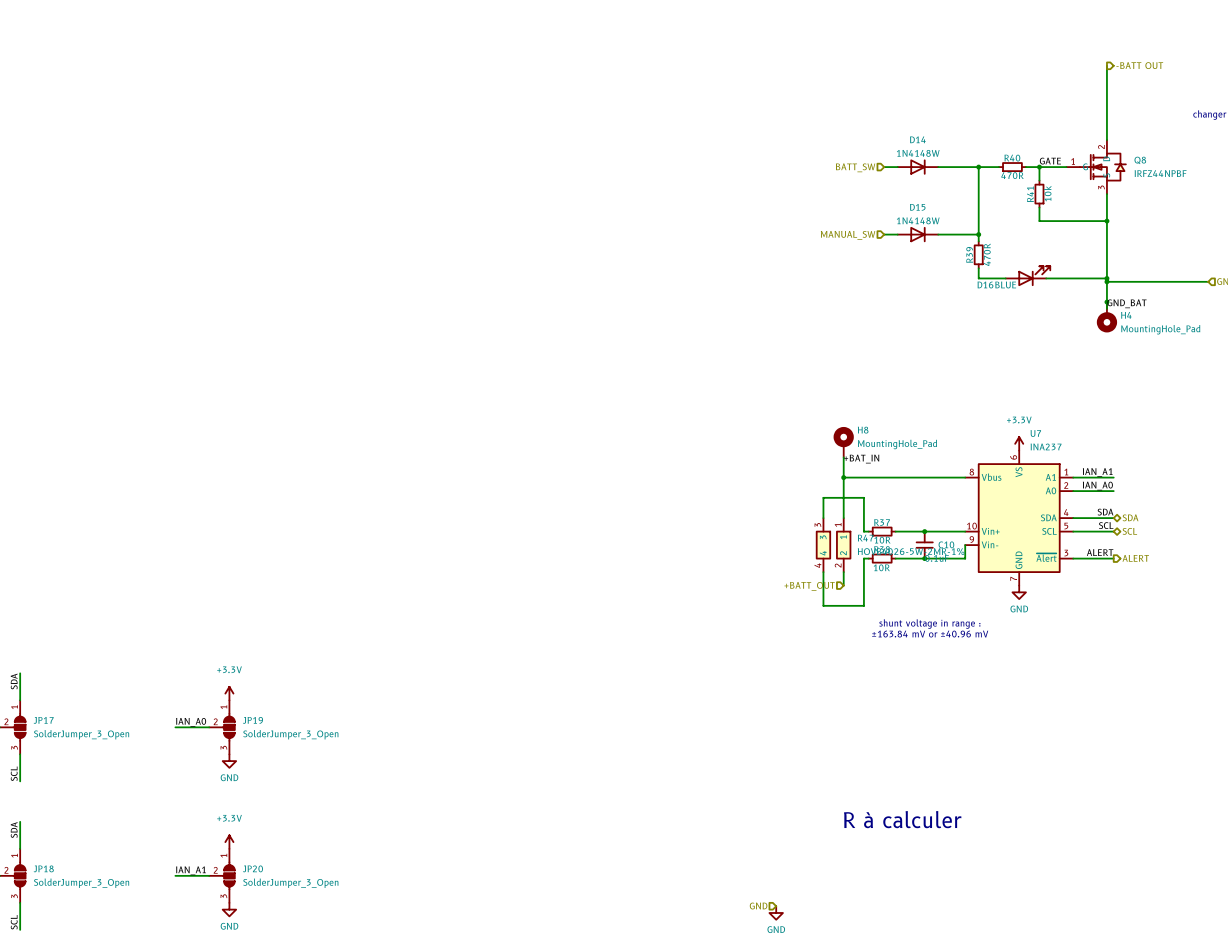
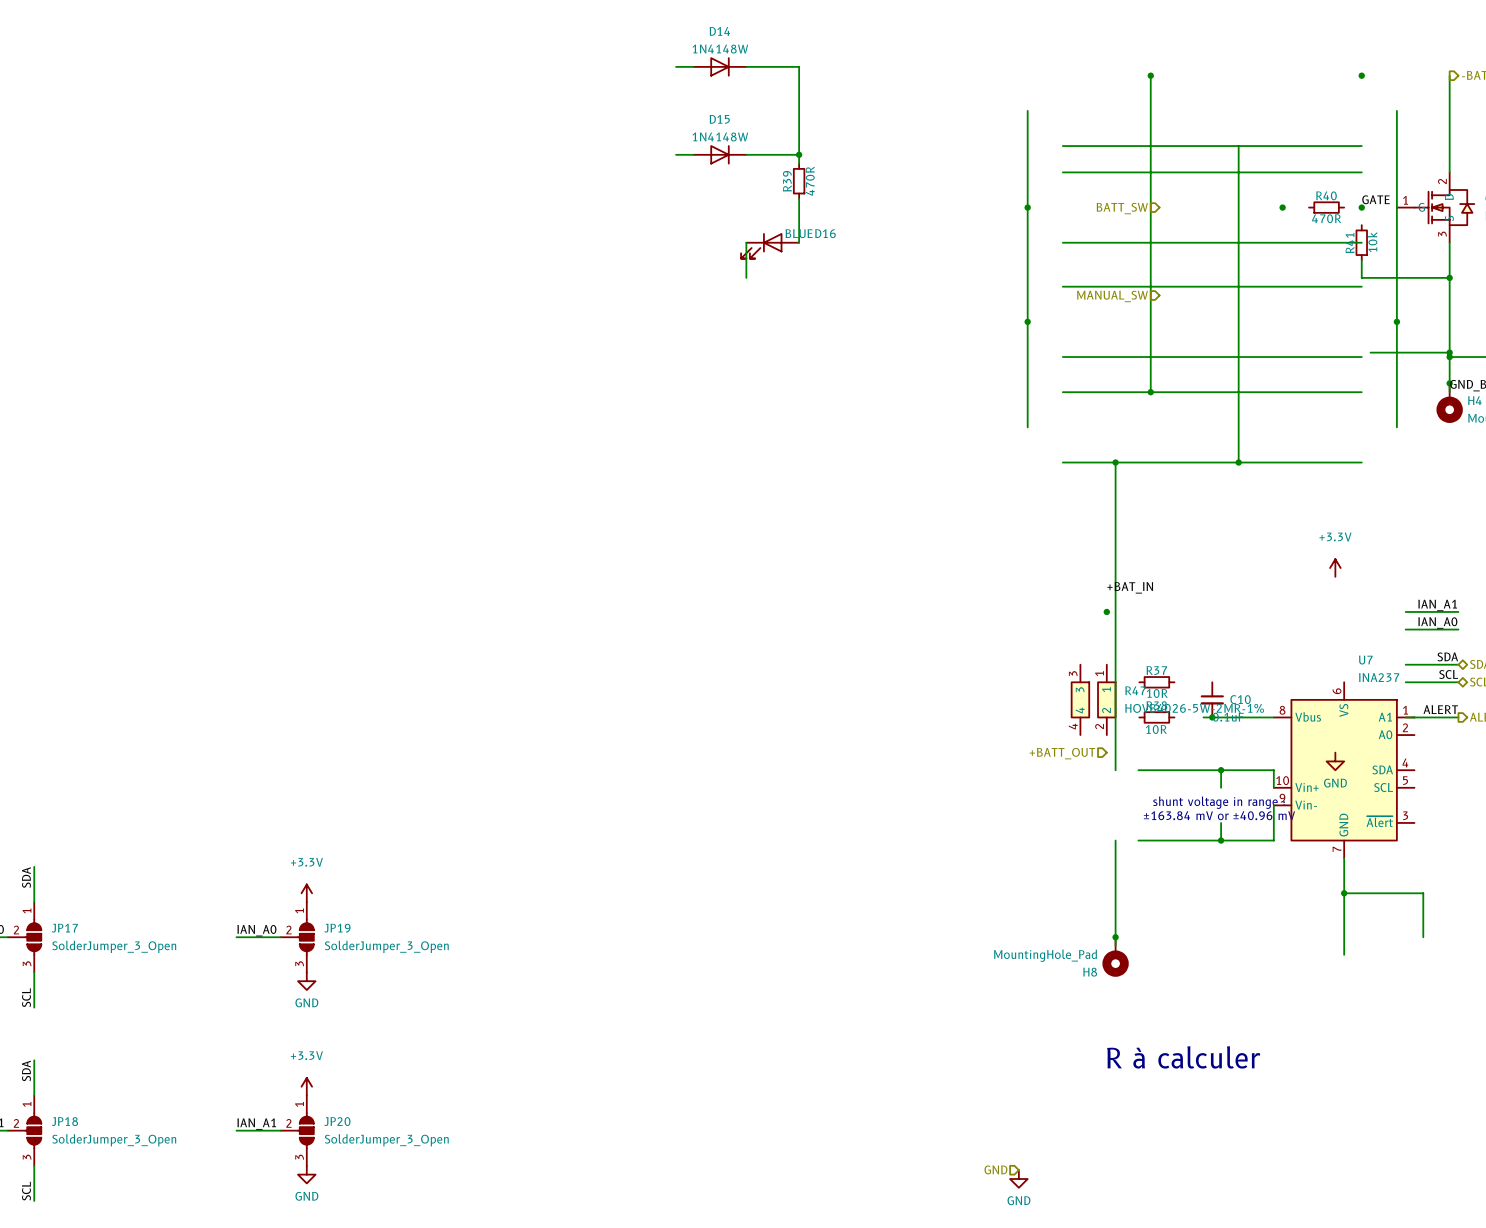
wire: none -> (676, 66) (693, 66)
wire: none -> (746, 66) (799, 66) (799, 163)
wire: none -> (1150, 75) (1150, 392)
junction: none -> (1150, 75)
junction: none -> (1361, 75)
wire: none -> (1027, 110) (1027, 427)
wire: none -> (1396, 110) (1396, 427)
wire: none -> (1062, 146) (1361, 146)
wire: none -> (1238, 146) (1238, 462)
wire: none -> (676, 154) (693, 154)
wire: none -> (746, 154) (799, 154)
junction: none -> (799, 154)
wire: none -> (1062, 172) (1361, 172)
wire: none -> (799, 198) (799, 242)
junction: none -> (1027, 207)
wire: (884, 167) (897, 167) -> none
D14 position: (917, 167) -> (719, 66)
wire: (938, 167) (998, 167) -> none
wire: (978, 167) (978, 241) -> none
wire: (1025, 167) (1066, 167) -> none
wire: (1039, 167) (1039, 180) -> none
wire: none -> (746, 242) (746, 277)
wire: none -> (1062, 242) (1361, 242)
wire: none -> (1062, 286) (1361, 286)
wire: (884, 234) (897, 234) -> none
D15 position: (917, 234) -> (719, 154)
wire: (938, 234) (978, 234) -> none
junction: (978, 234) -> none
junction: none -> (1027, 321)
R39 position: (978, 254) -> (799, 181)
junction: none -> (1396, 321)
wire: (978, 268) (978, 278) (1005, 278) -> none
D16 position: (1027, 276) -> (770, 245)
D16 rotation: 0° (1034, 276) -> 180° (761, 245)
wire: none -> (1062, 357) (1361, 357)
wire: none -> (1062, 392) (1361, 392)
junction: none -> (1150, 392)
wire: none -> (1062, 462) (1361, 462)
wire: none -> (1115, 462) (1115, 770)
junction: none -> (1115, 462)
junction: none -> (1238, 462)
H8 rotation: 0° (843, 437) -> 180° (1115, 963)
H8 position: (843, 442) -> (1115, 957)
wire: (843, 457) (843, 518) -> none
wire: (843, 477) (965, 477) -> none
wire: (823, 518) (823, 497) (863, 497) (863, 531) (868, 531) -> none
U7 position: (1019, 518) -> (1344, 770)
wire: (895, 531) (965, 531) -> none
junction: (924, 531) -> none
wire: (965, 545) (965, 558) -> (1273, 717) (1265, 717)
wire: (868, 558) (863, 558) (863, 605) (823, 605) (823, 572) -> none
wire: (895, 558) (917, 558) -> none
wire: (843, 572) (843, 585) -> (1221, 770) (1221, 787)
wire: none -> (1138, 770) (1273, 770) (1273, 787)
junction: none -> (1221, 770)
wire: none -> (1273, 805) (1273, 840) (1138, 840)
wire: none -> (1221, 822) (1221, 840)
wire: none -> (1115, 840) (1115, 946)
junction: none -> (1221, 840)
wire: none -> (1344, 858) (1344, 954)
wire: none -> (1344, 893) (1423, 893) (1423, 937)
junction: none -> (1344, 893)
junction: none -> (1115, 937)

